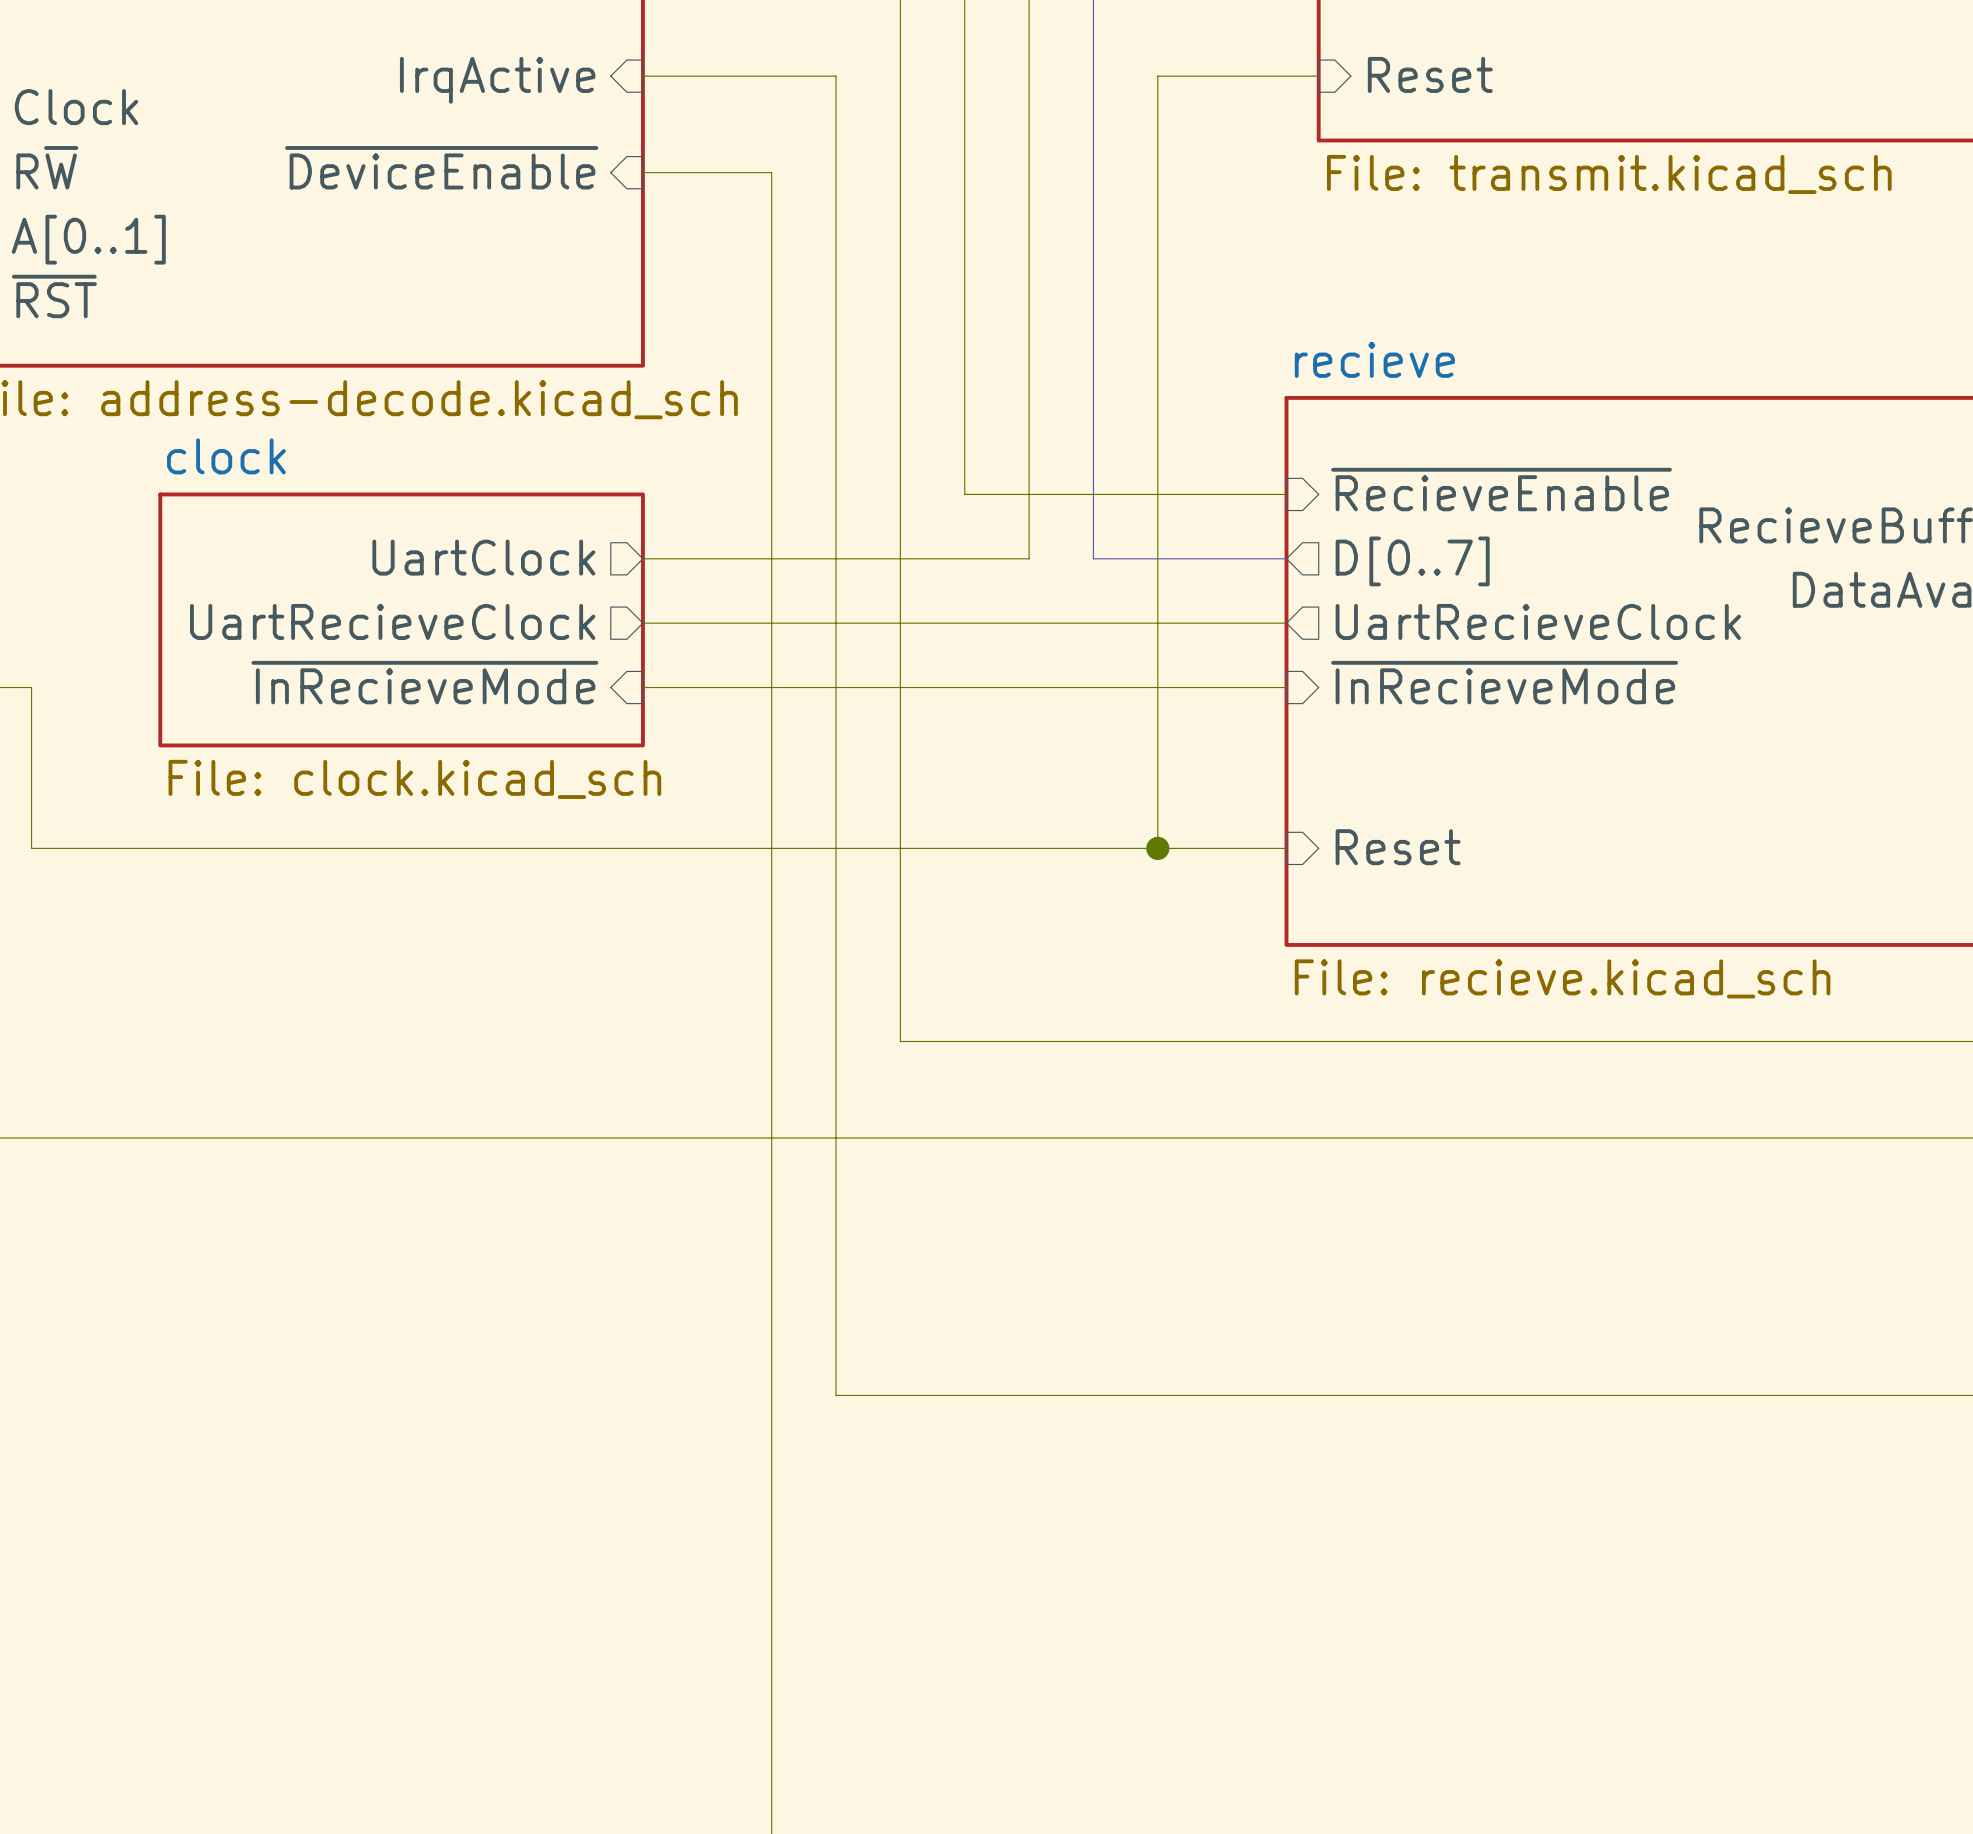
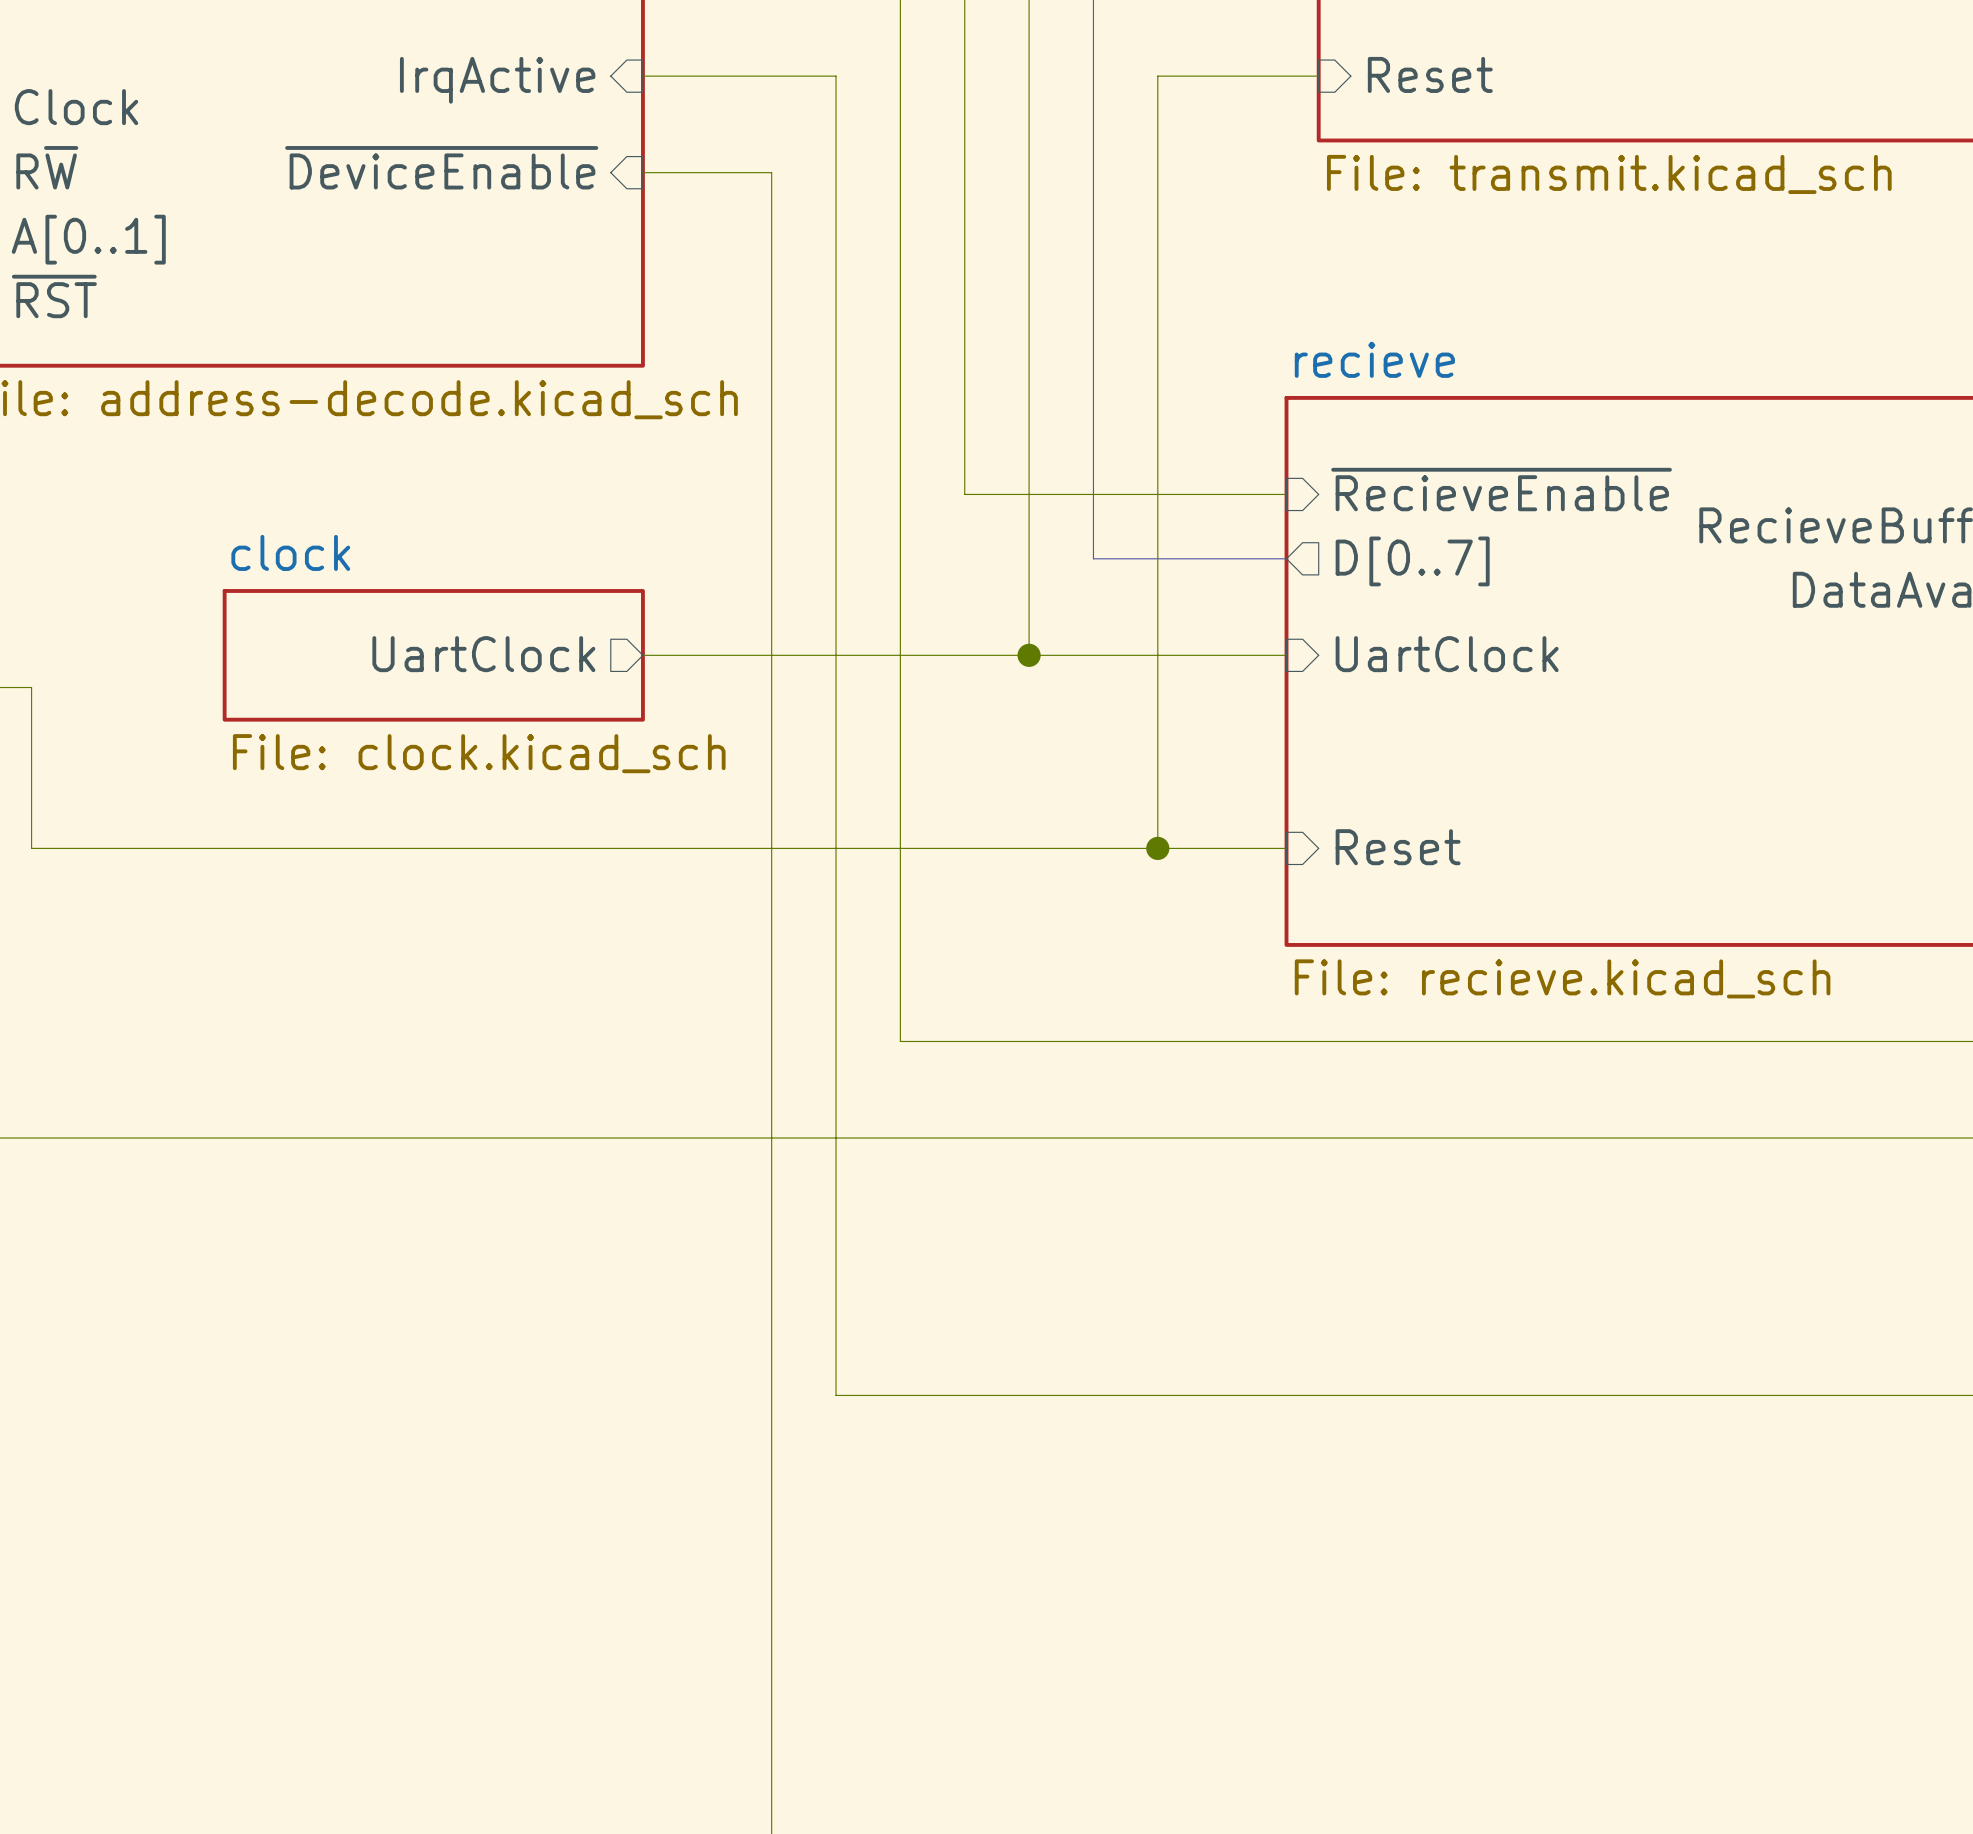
sheet pin position: UartClock (483, 557) -> UartClock (483, 654)
wire: (642, 558) (1029, 558) -> (1029, 655) (1029, 558)
sheet clock: File: clock.kicad_sch (401, 619) -> none
sheet pin: UartRecieveClock (392, 621) -> none
sheet pin shape: output (1538, 621) -> input (1447, 654)
sheet pin: UartRecieveClock (1538, 621) -> UartClock (1447, 654)
wire: (642, 623) (1286, 623) -> none
sheet clock: none -> File: clock.kicad_sch (433, 655)
junction: none -> (1029, 655)
sheet pin: ~{InRecieveMode} (424, 682) -> none
sheet pin: ~{InRecieveMode} (1504, 682) -> none
wire: (642, 687) (1286, 687) -> (642, 655) (1286, 655)

